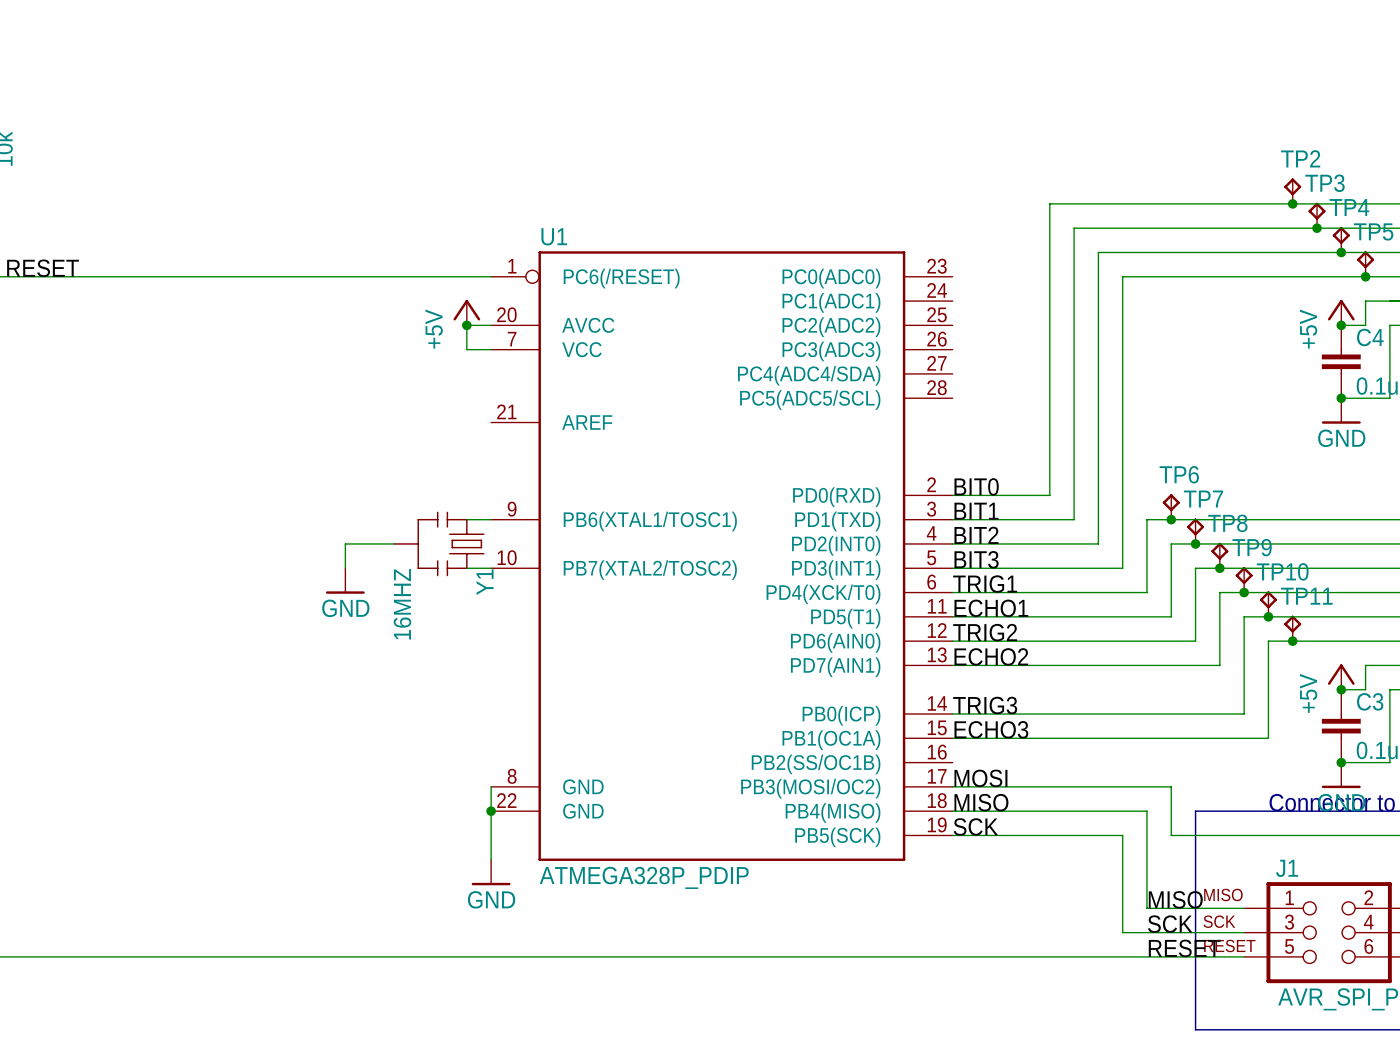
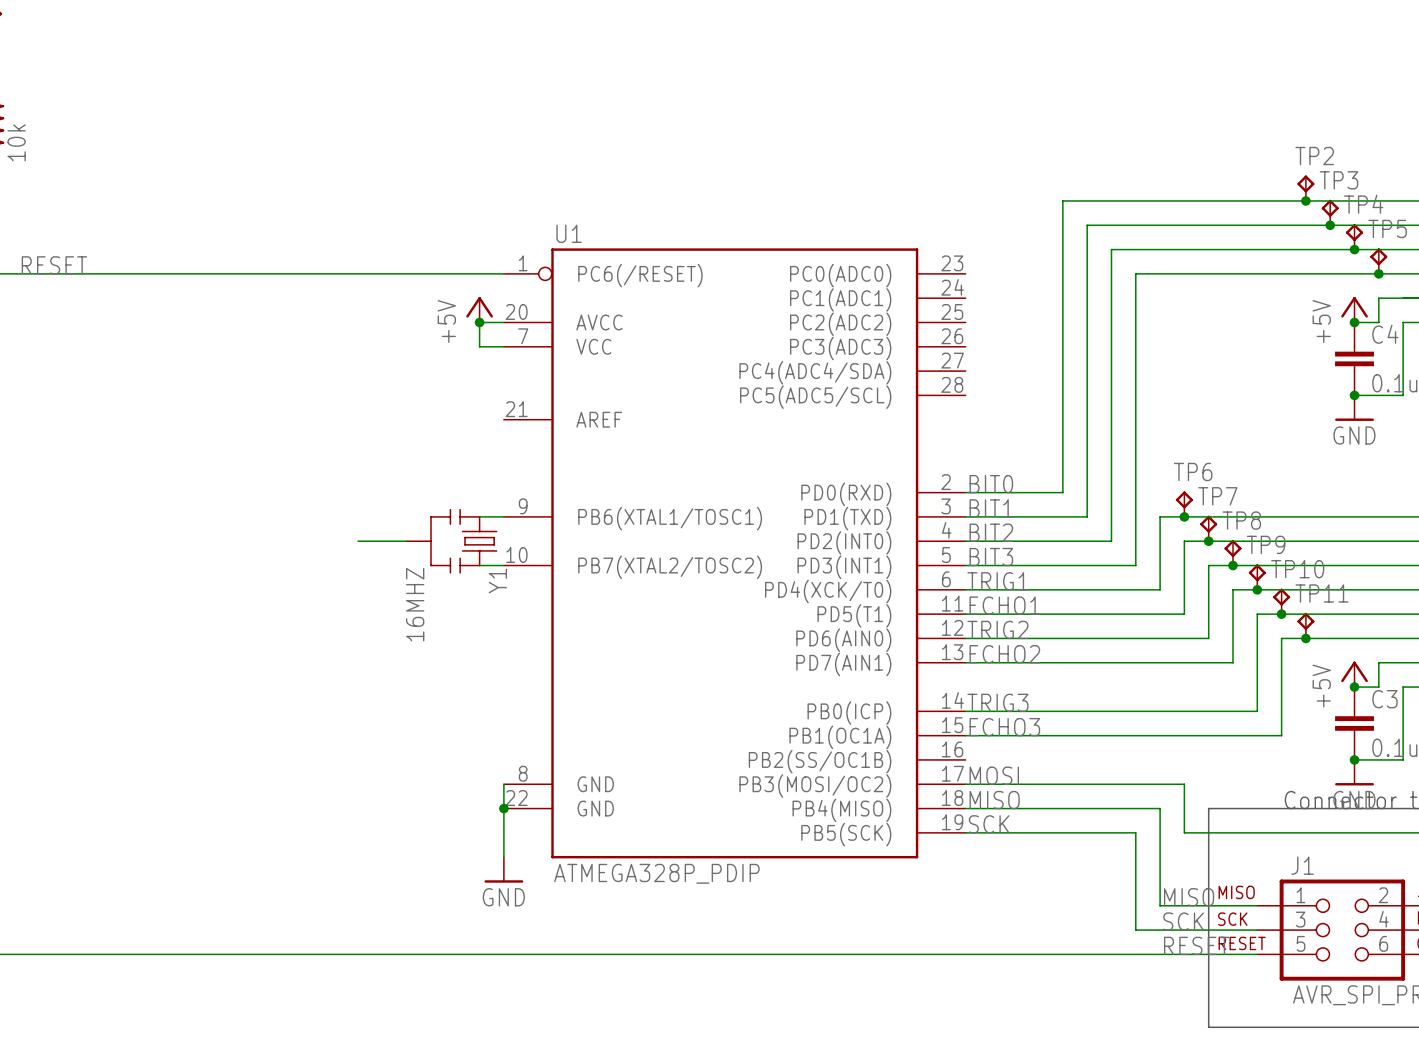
wire: (345, 543) (345, 568) -> none
power symbol: GND (345, 581) -> none

